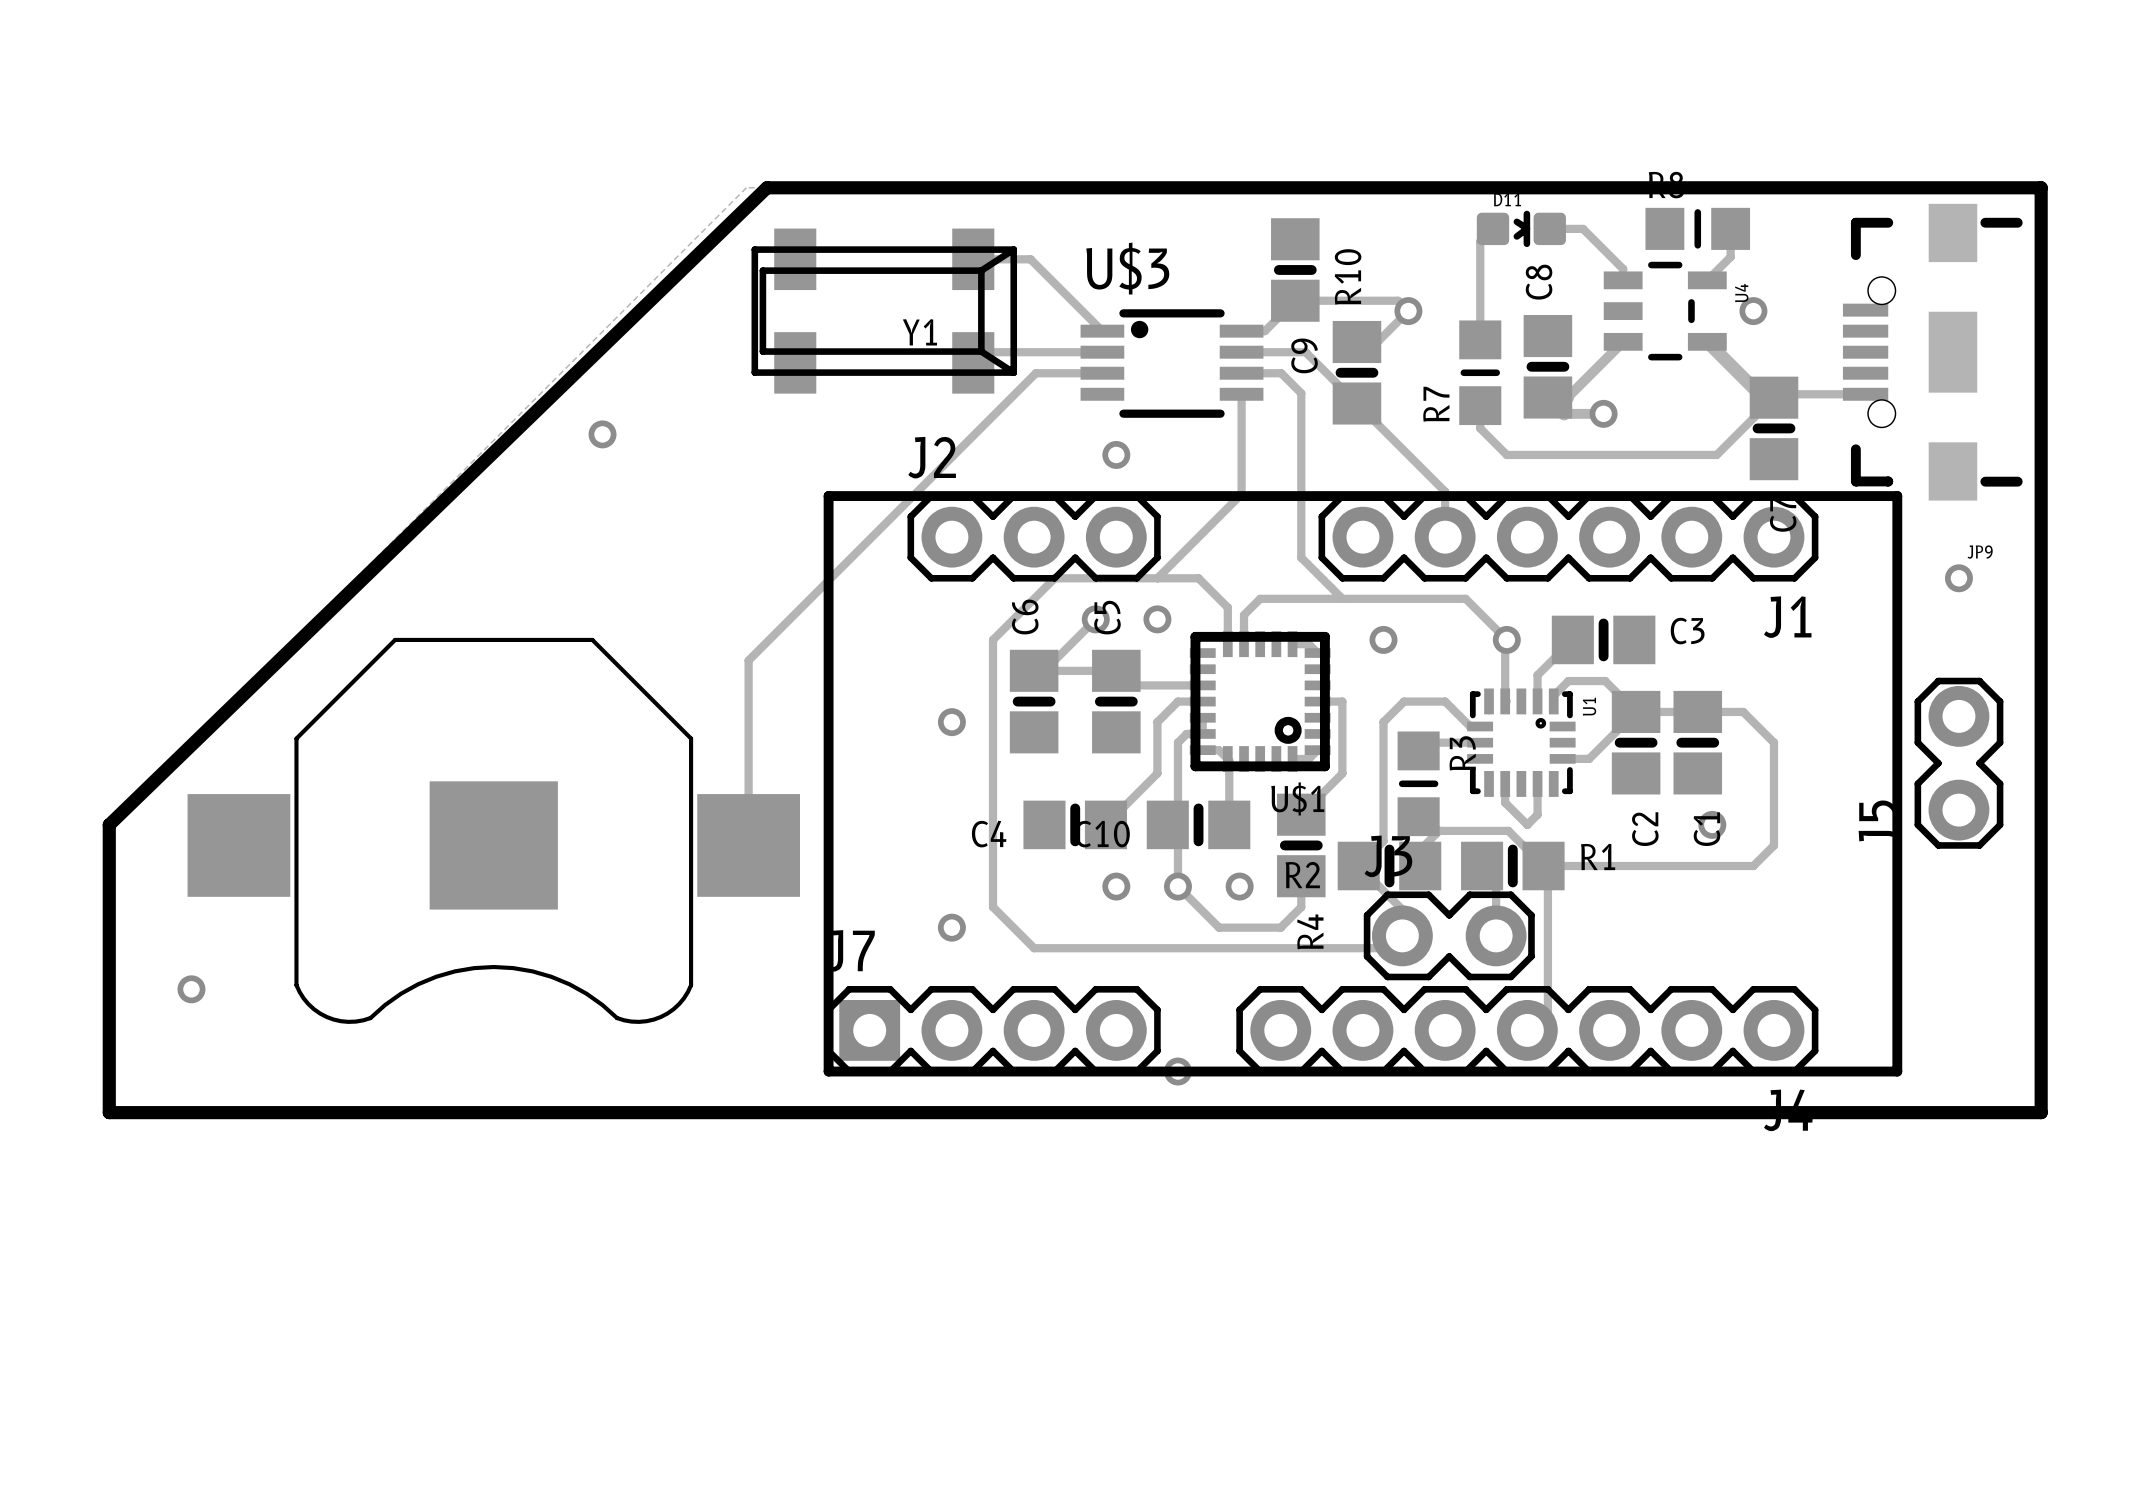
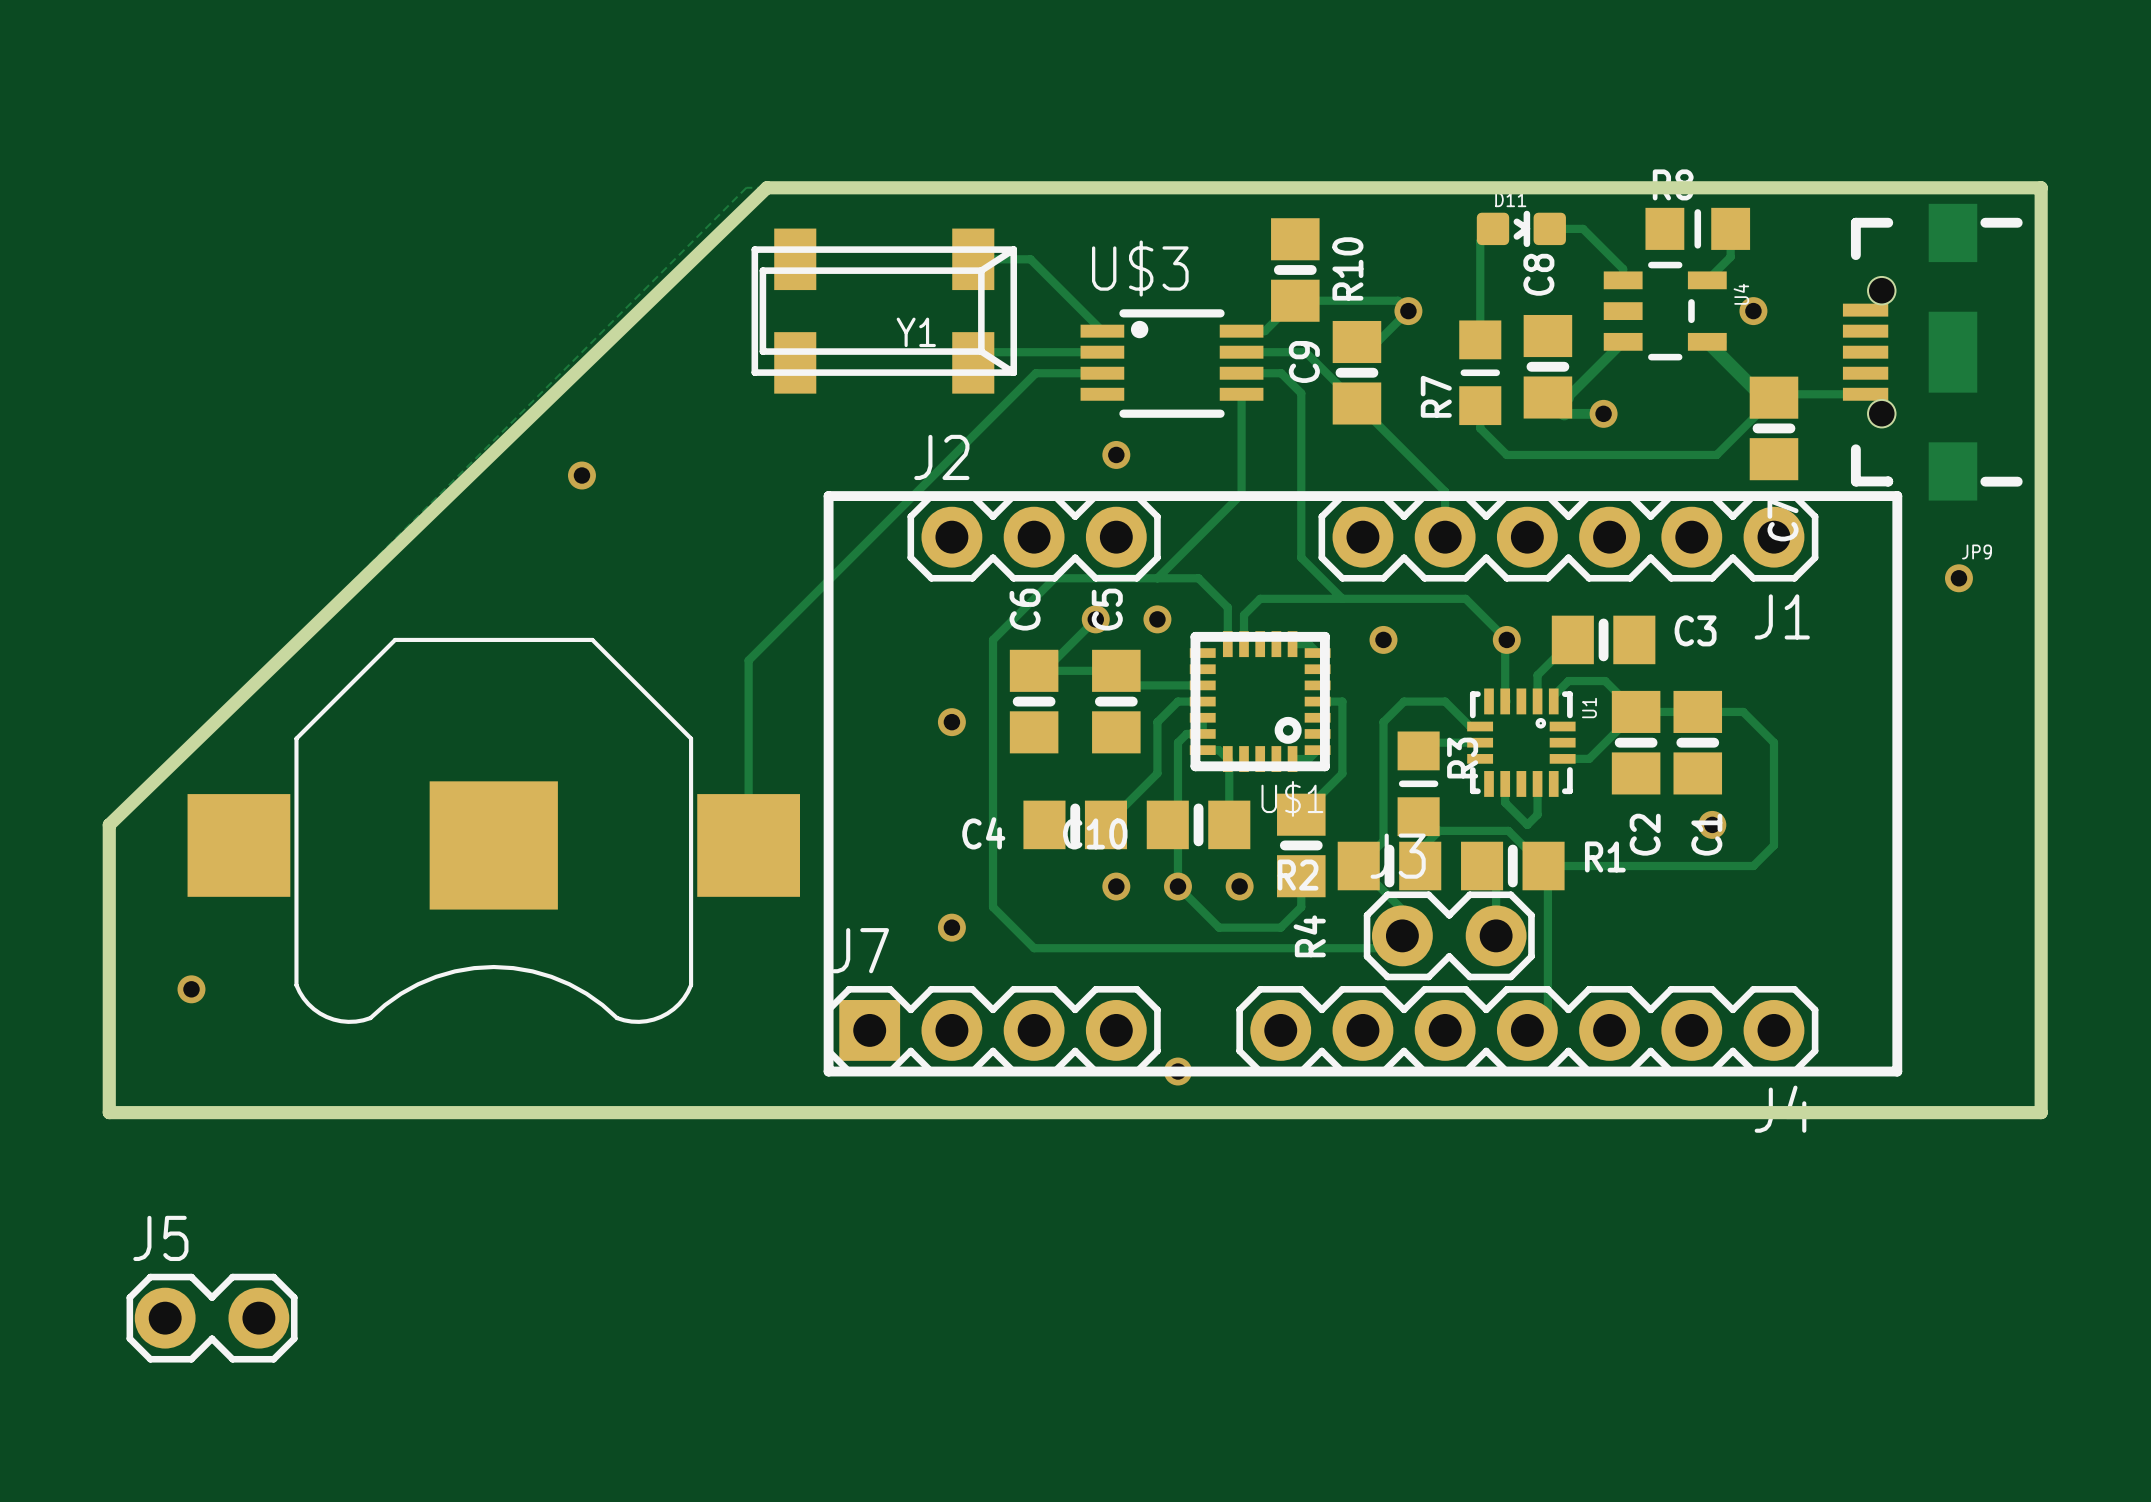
via position: (602, 434) -> (581, 475)
J5 rotation: 0° (1958, 763) -> 90° clockwise (212, 1318)
J5 position: (1958, 763) -> (212, 1318)

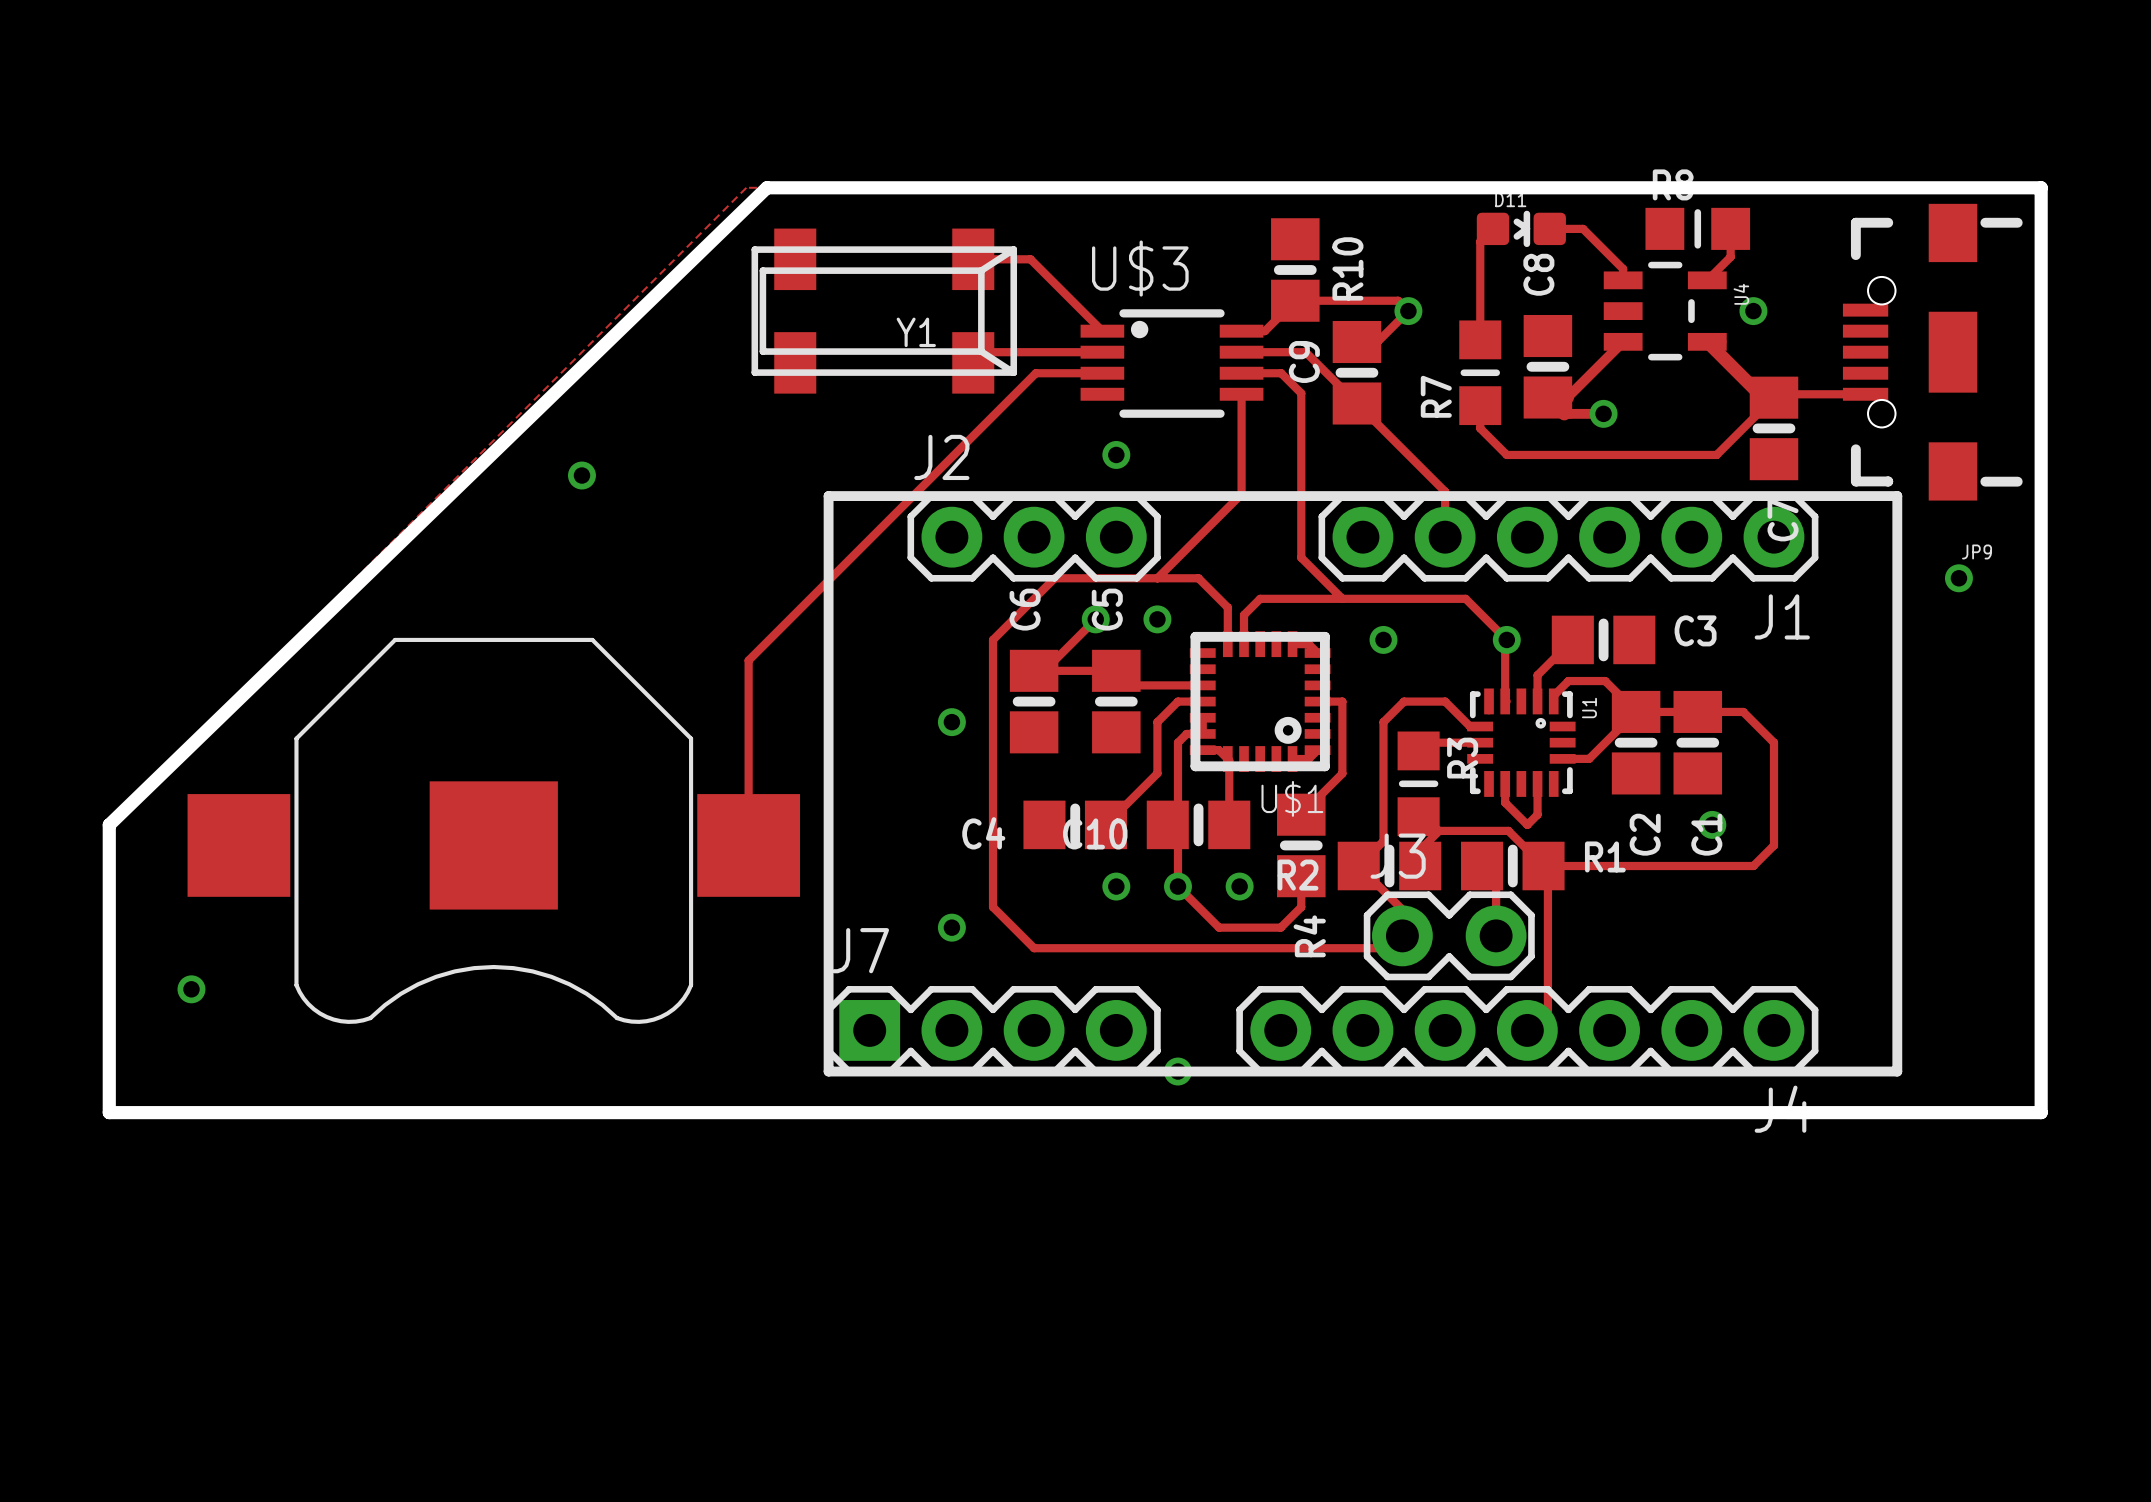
J5: (212, 1318) -> none

